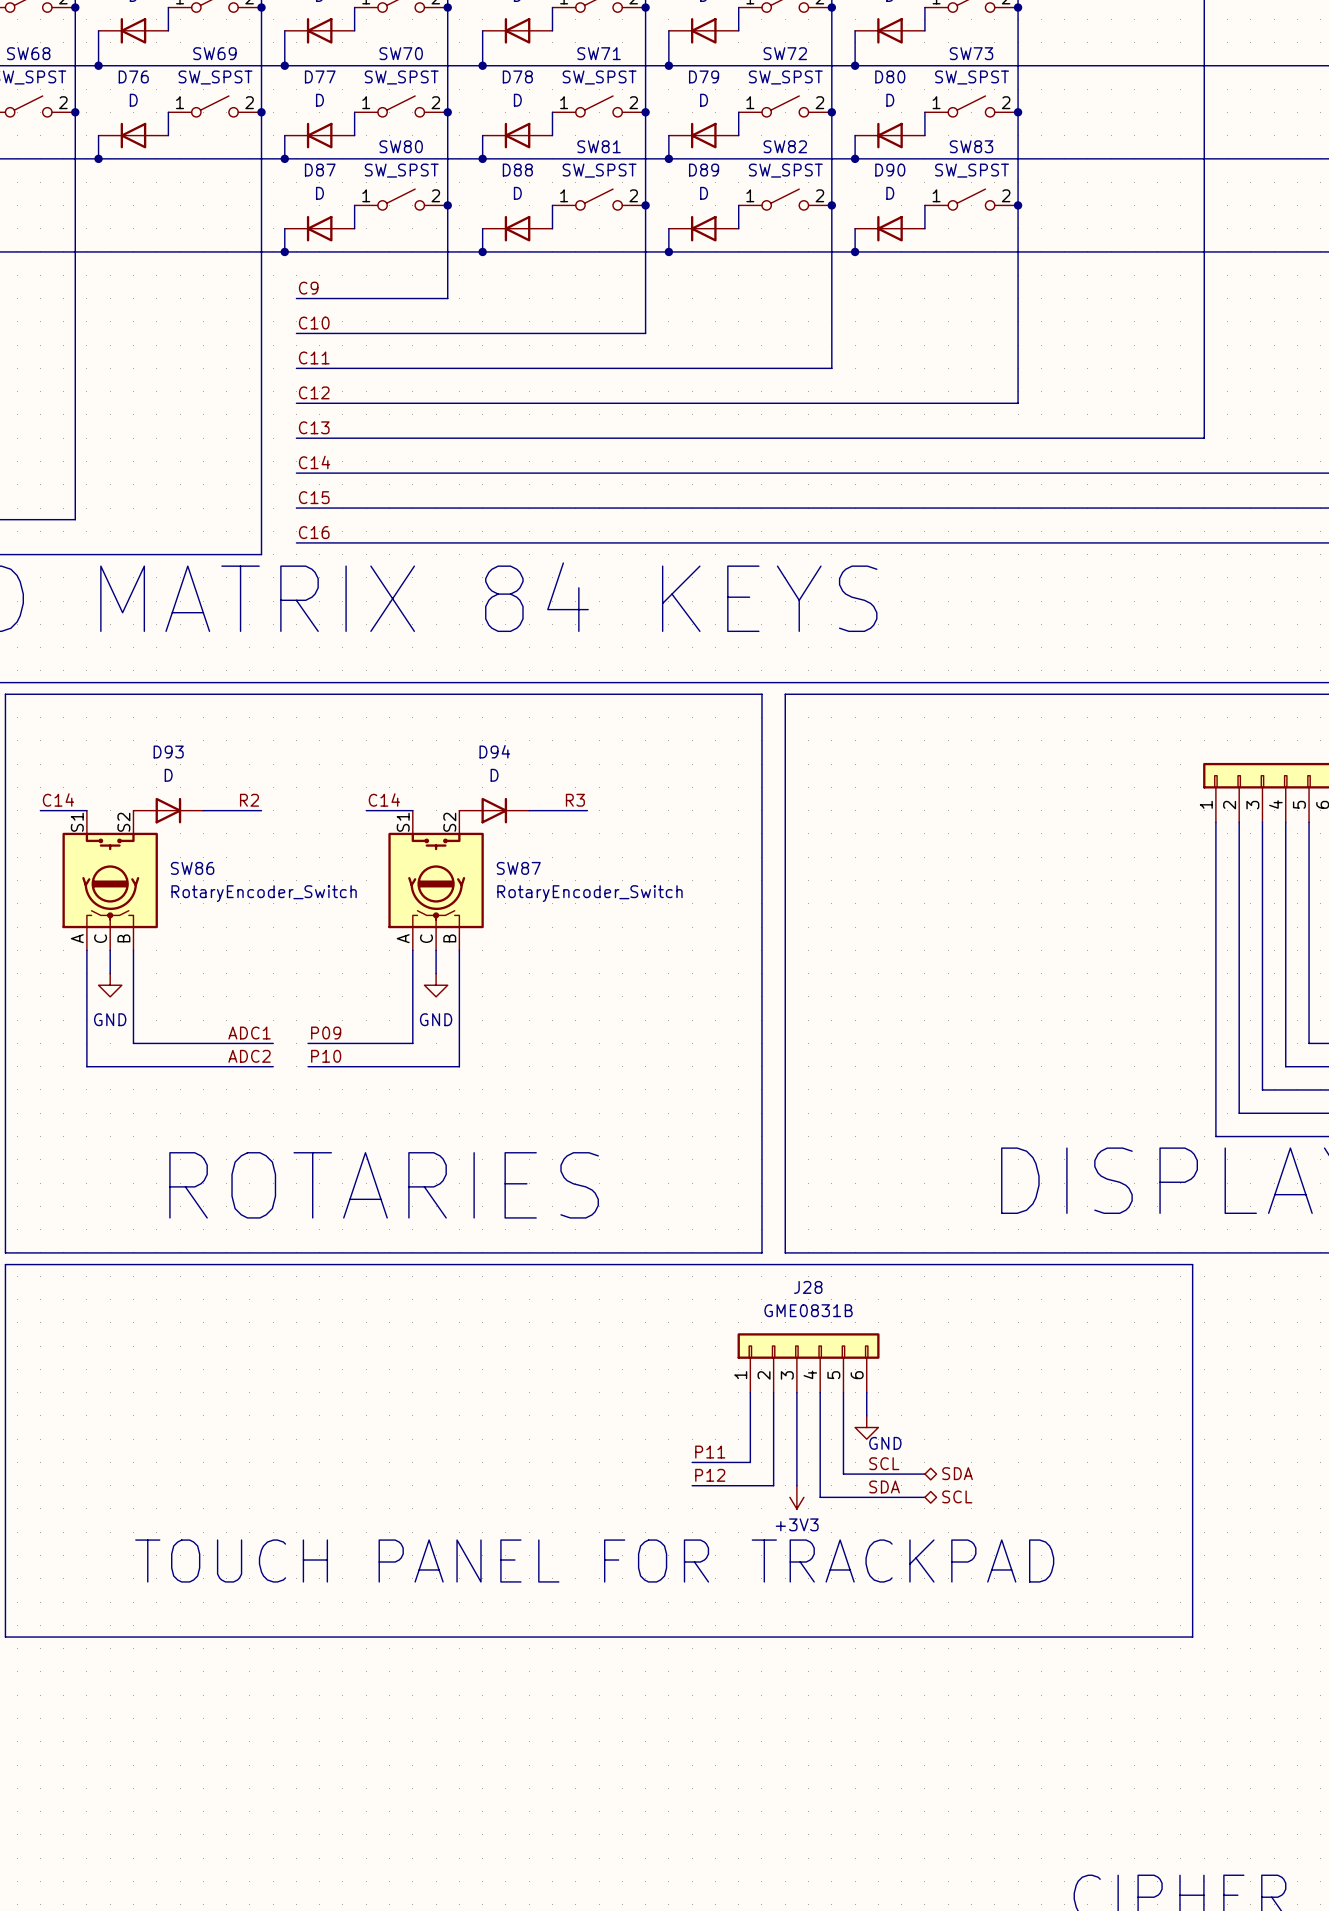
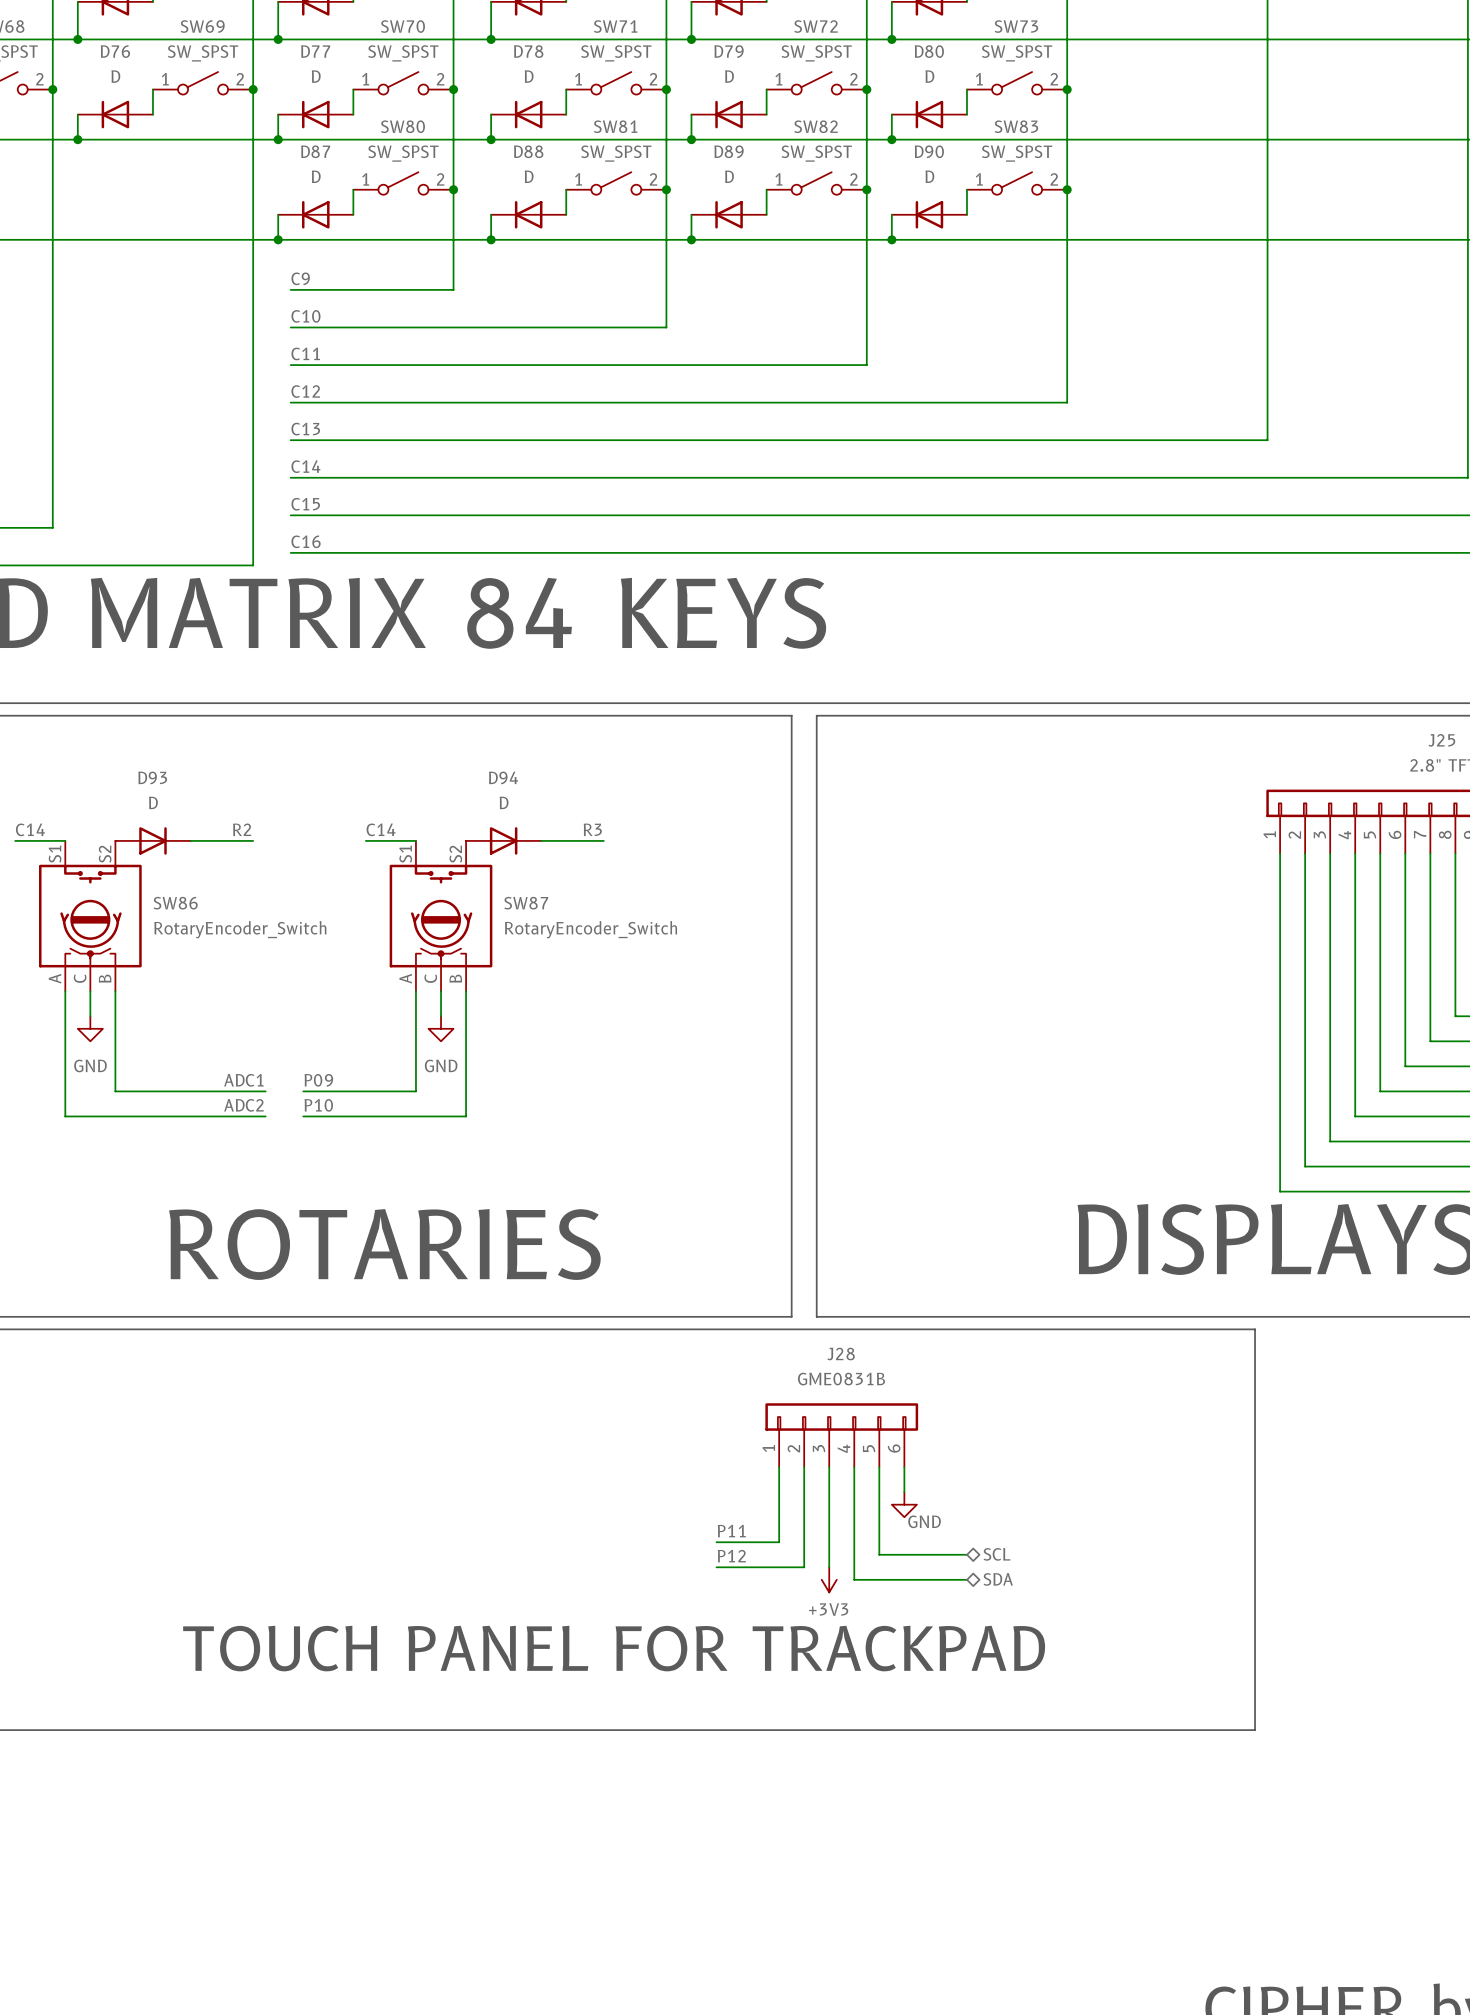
label: SCL (884, 1463) -> none
hierarchical label: SDA (957, 1473) -> SCL (996, 1554)
label: SDA (884, 1486) -> none
hierarchical label: SCL (957, 1496) -> SDA (998, 1579)

